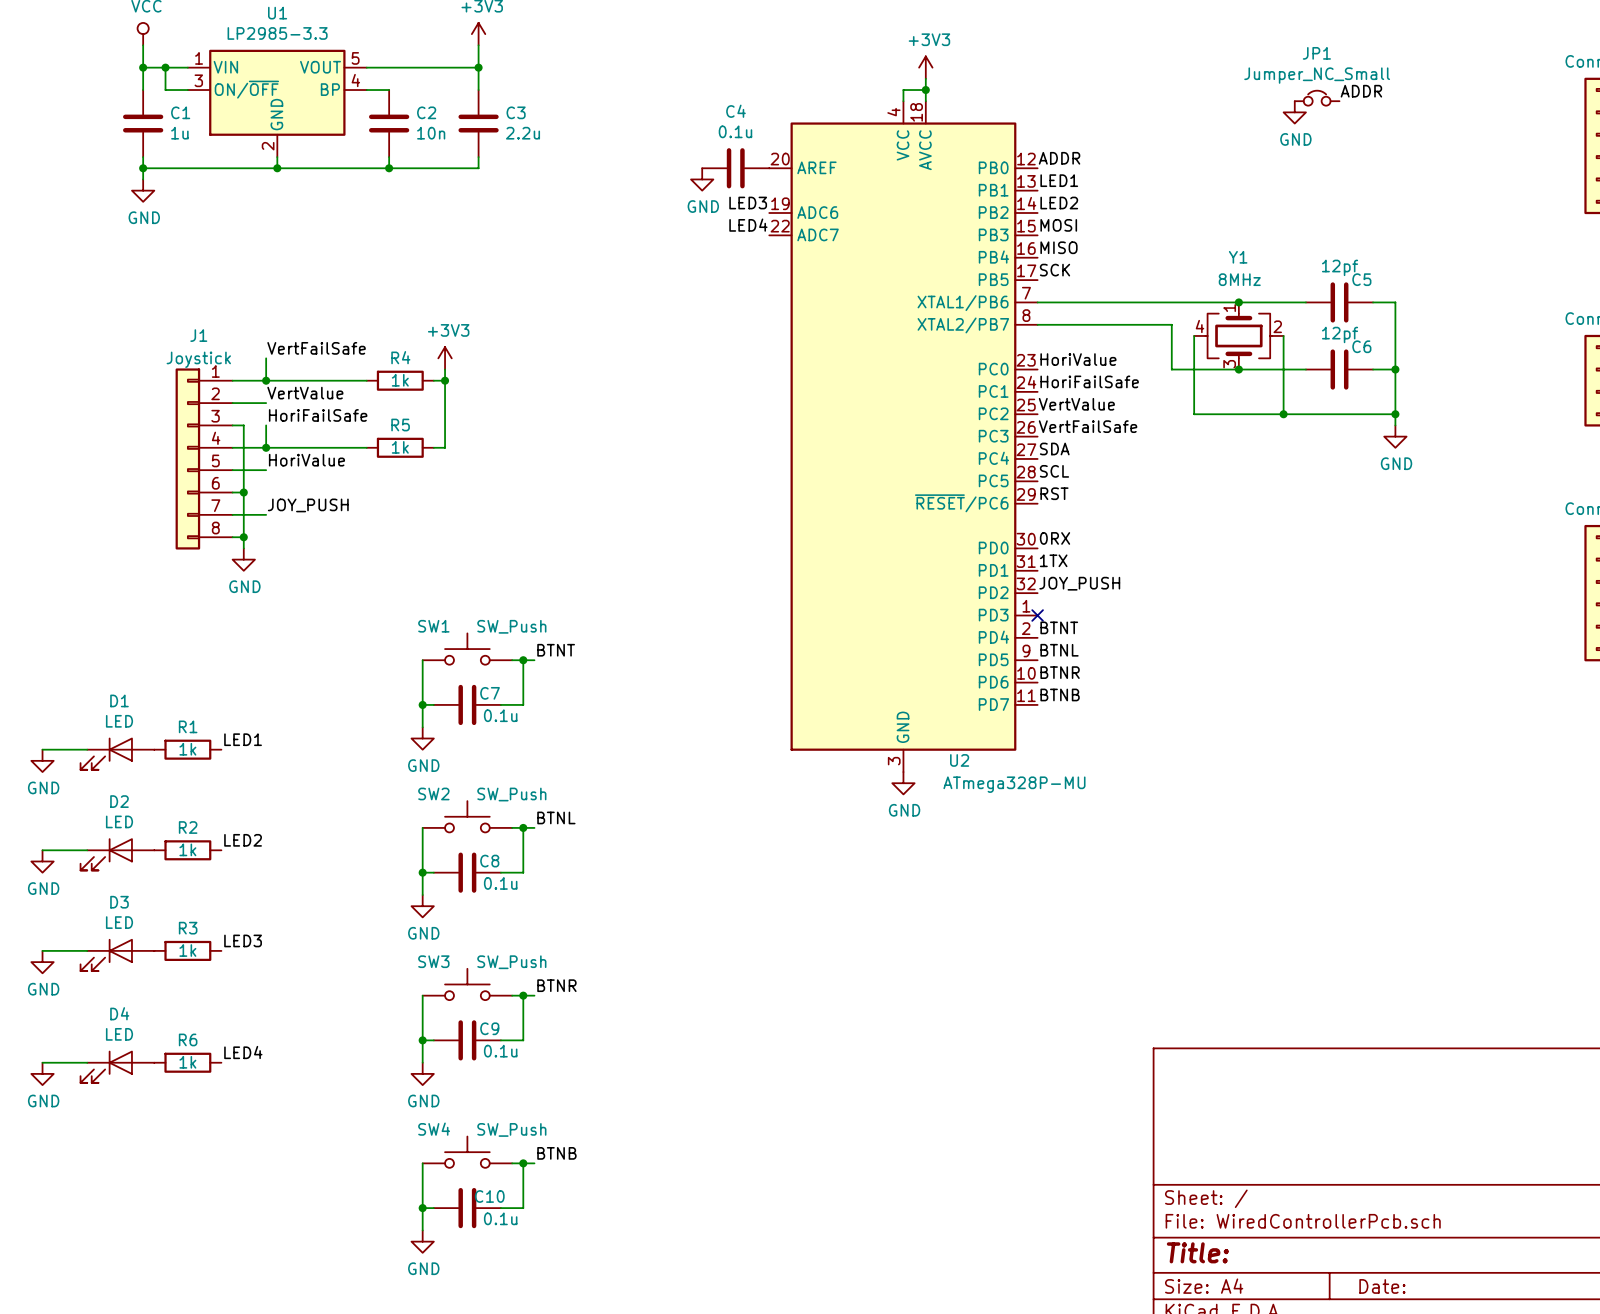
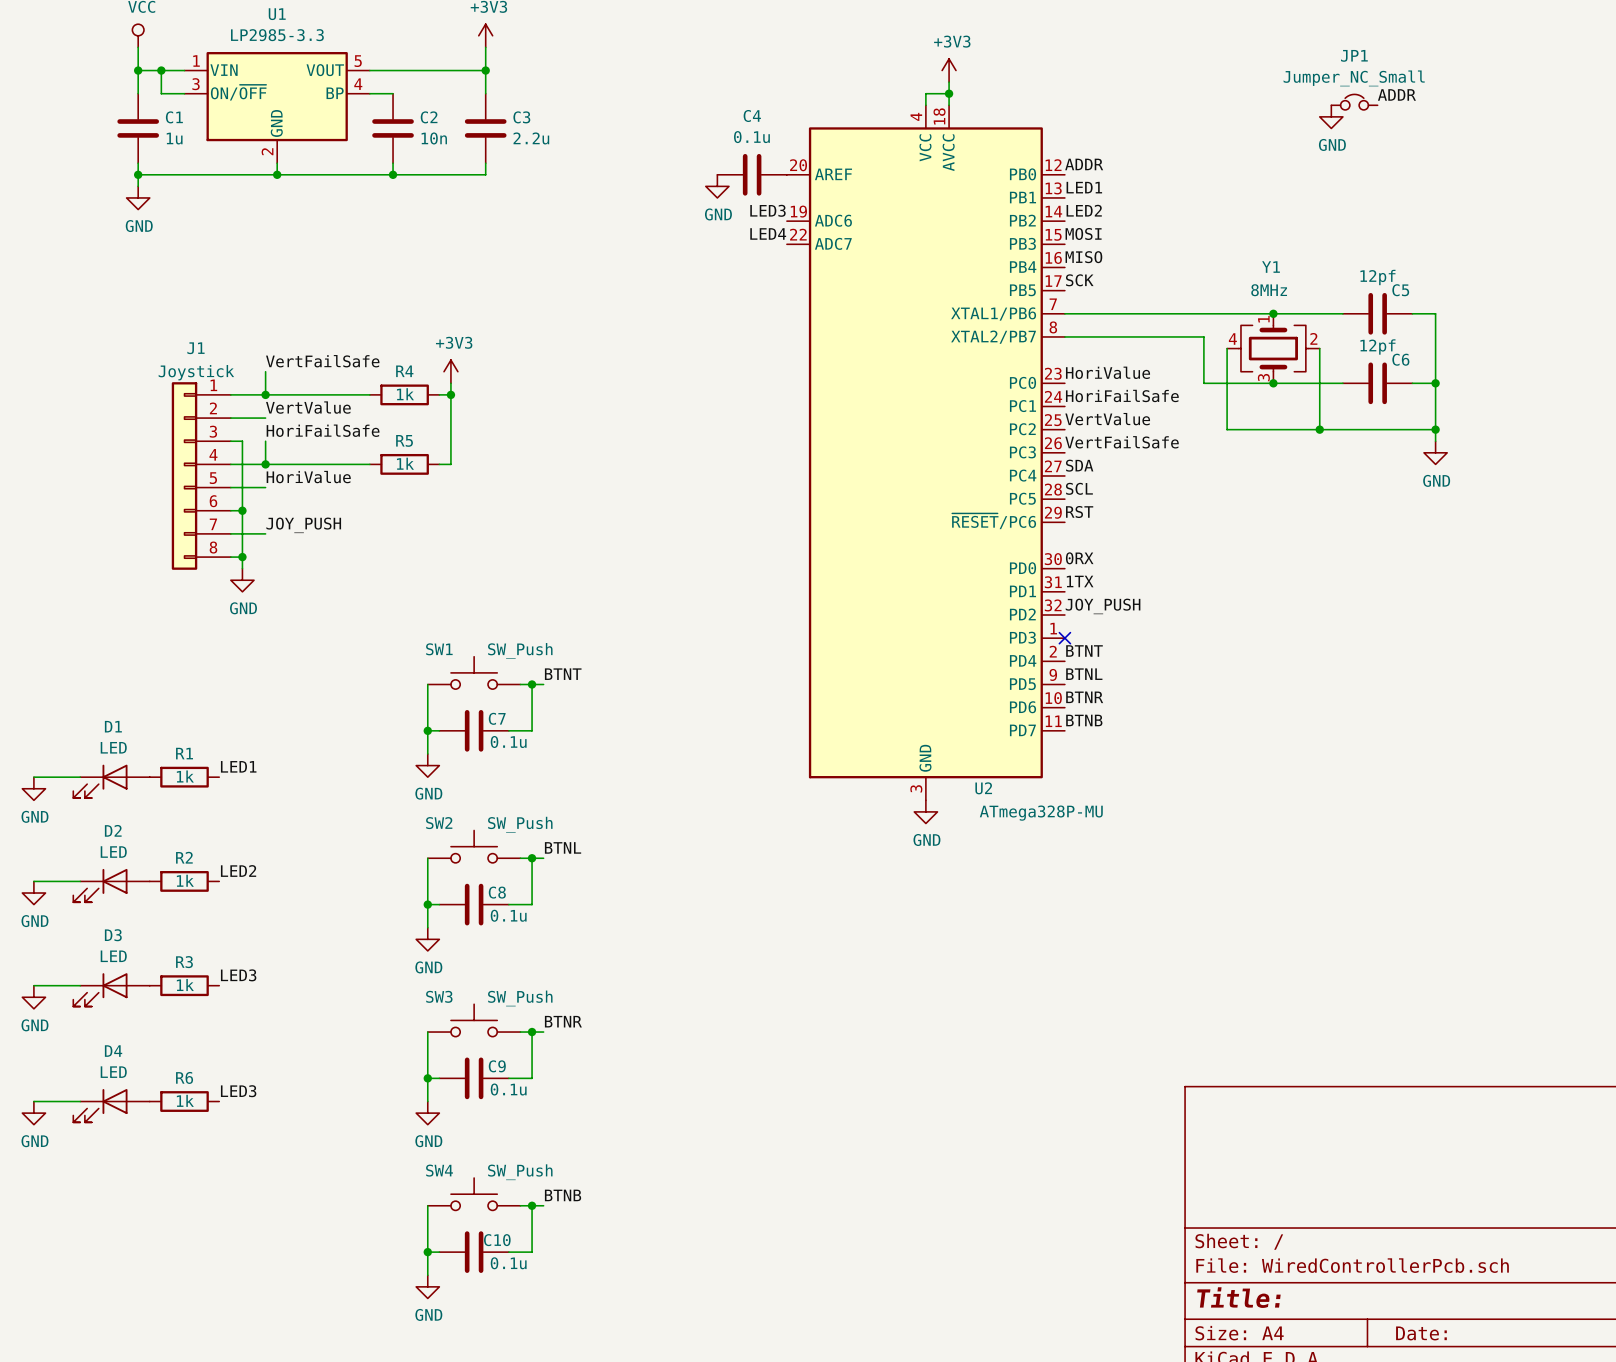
label: LED4 (243, 1052) -> LED3 (238, 1091)

